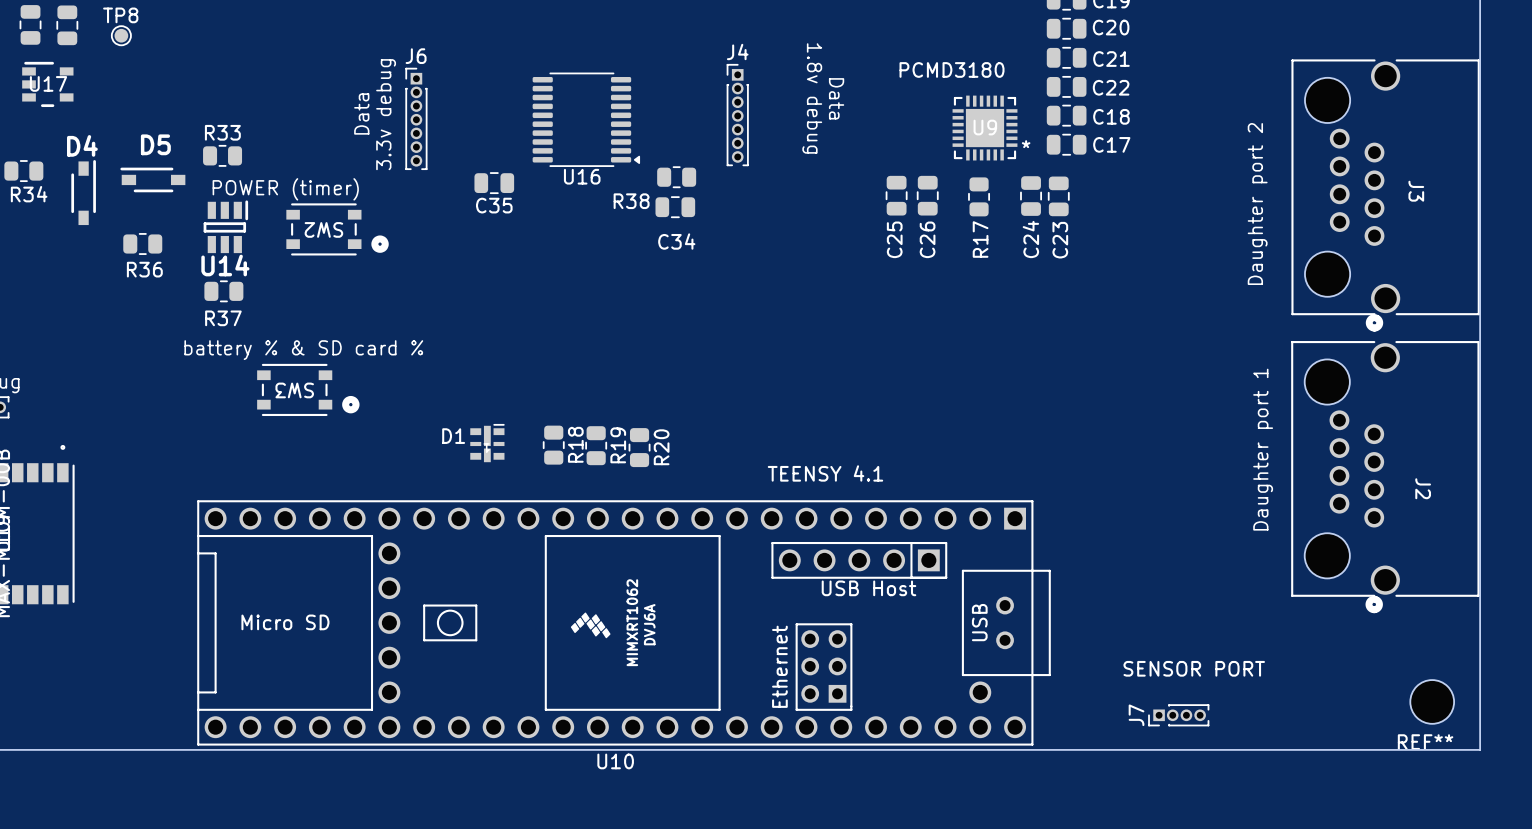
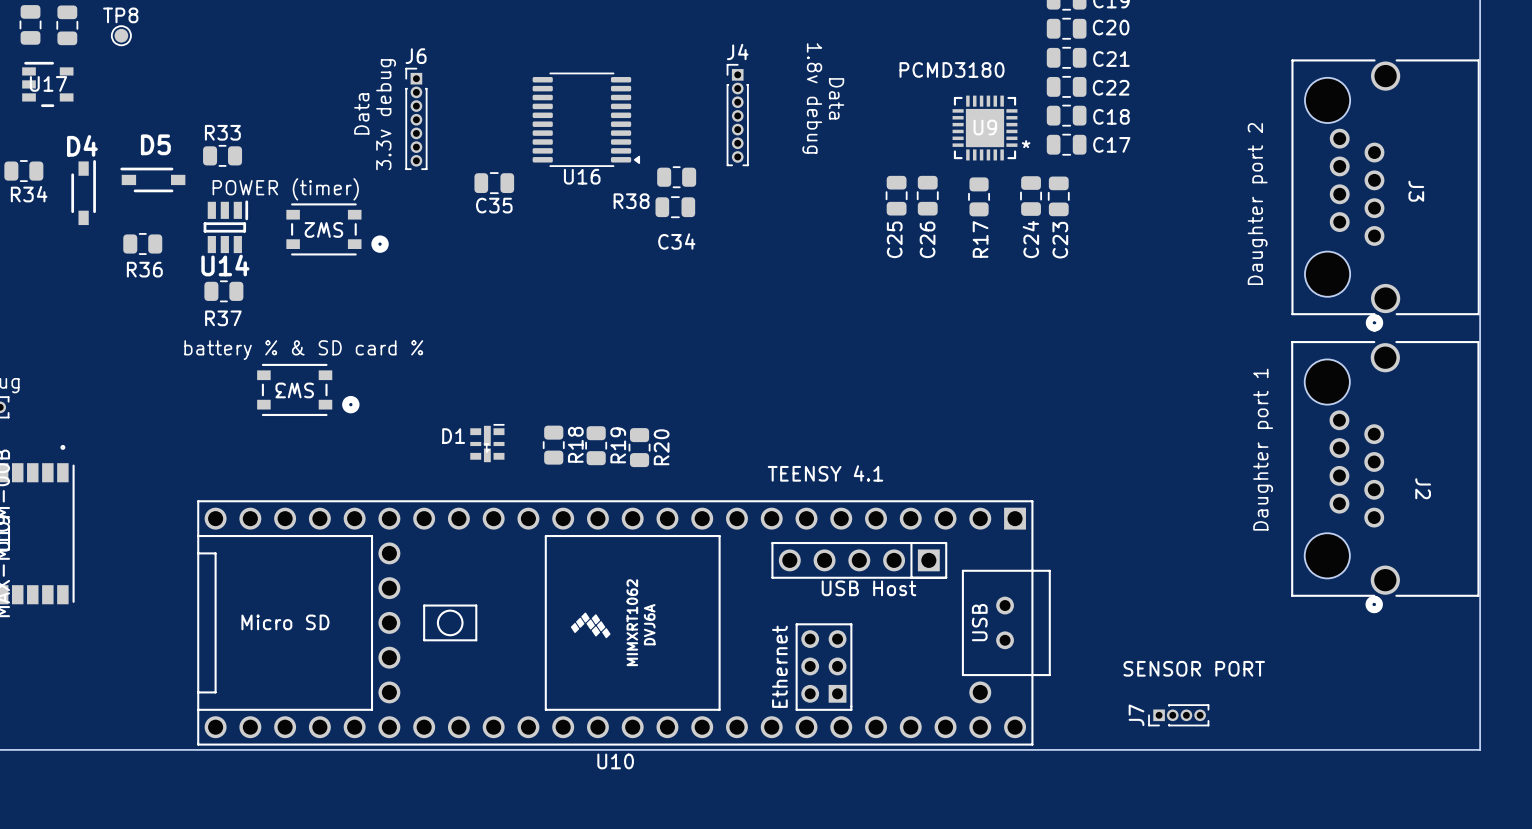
REF**: (1432, 701) -> none

